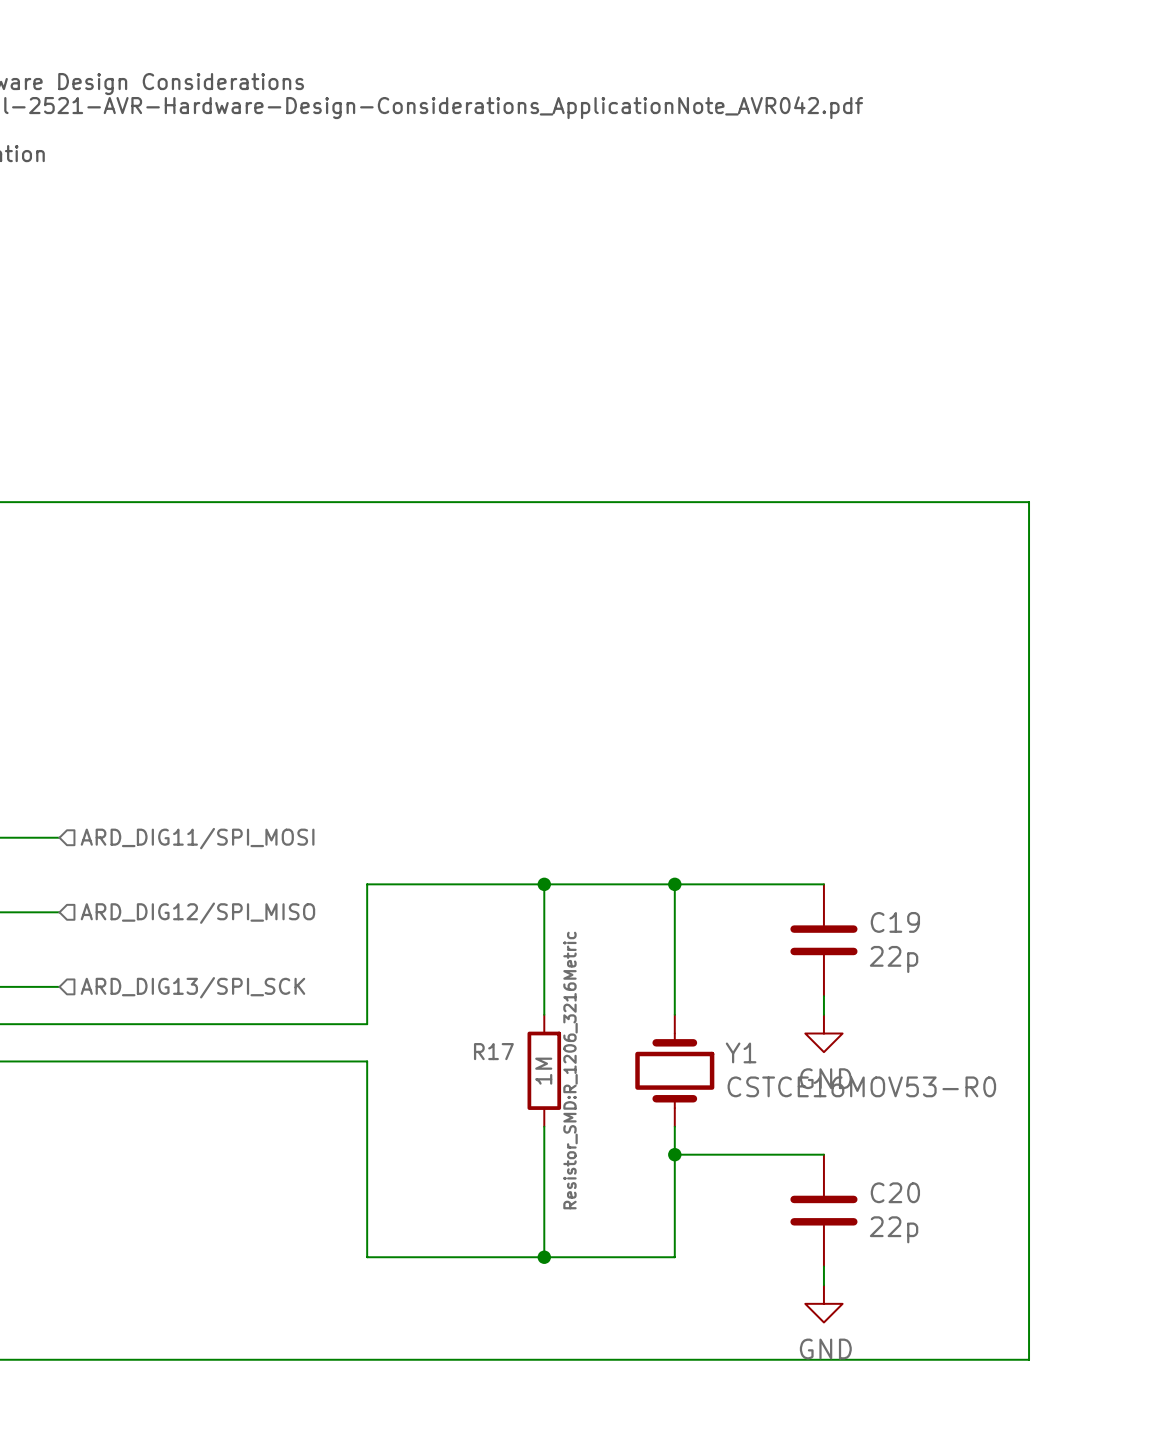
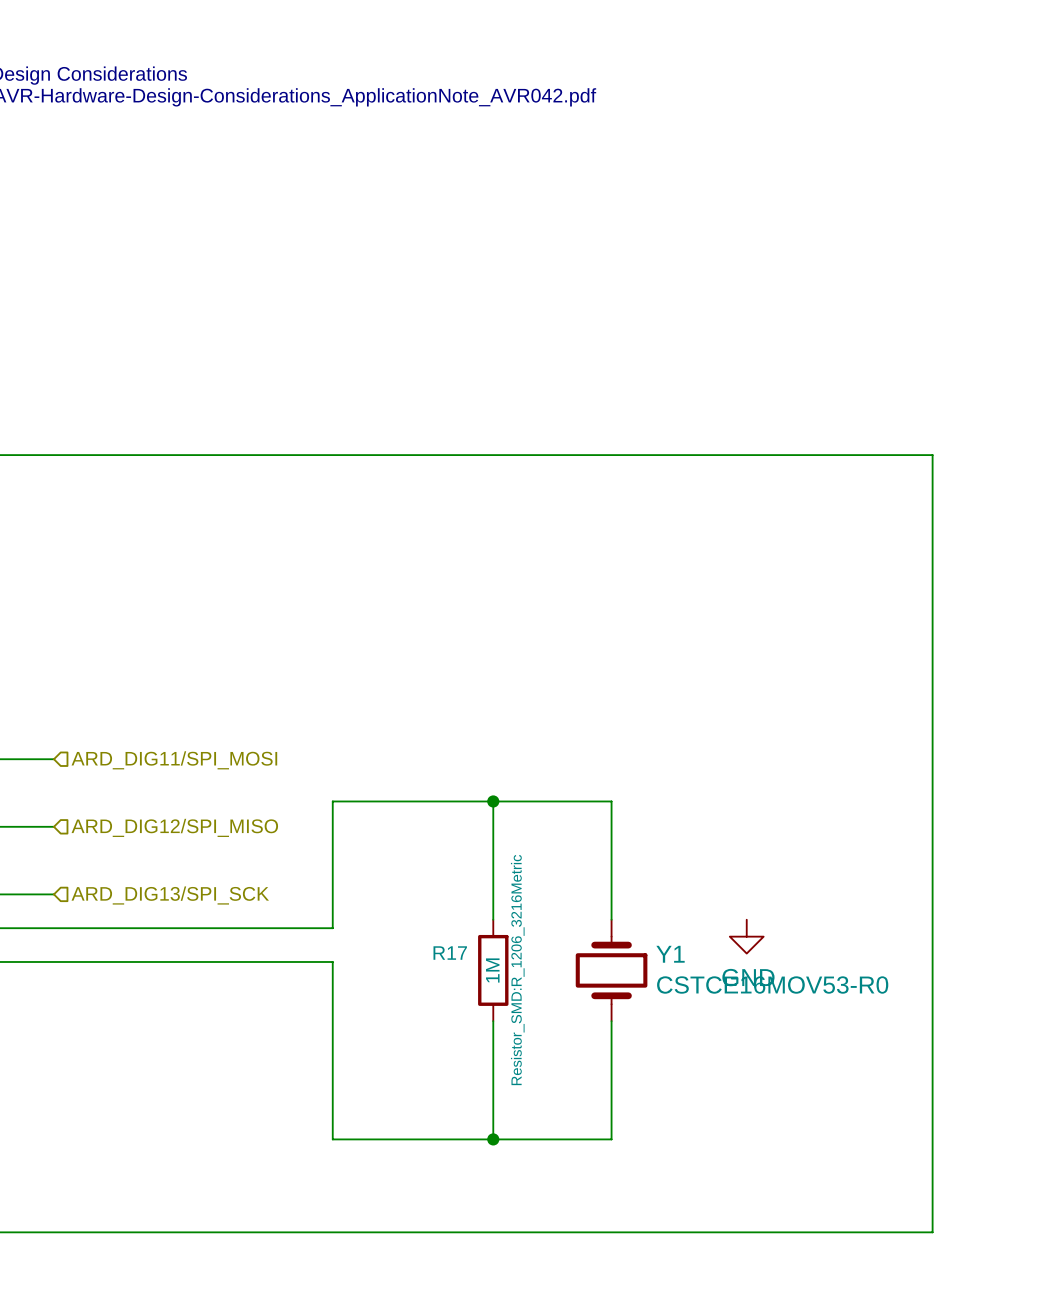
wire: (674, 884) (823, 884) -> none
junction: (674, 884) -> none
C19: 22p (823, 940) -> none
wire: (823, 996) (823, 1014) -> none
wire: (674, 1154) (823, 1154) -> none
junction: (674, 1154) -> none
C20: 22p (823, 1210) -> none
wire: (823, 1266) (823, 1285) -> none
power symbol: GND (823, 1303) -> none

